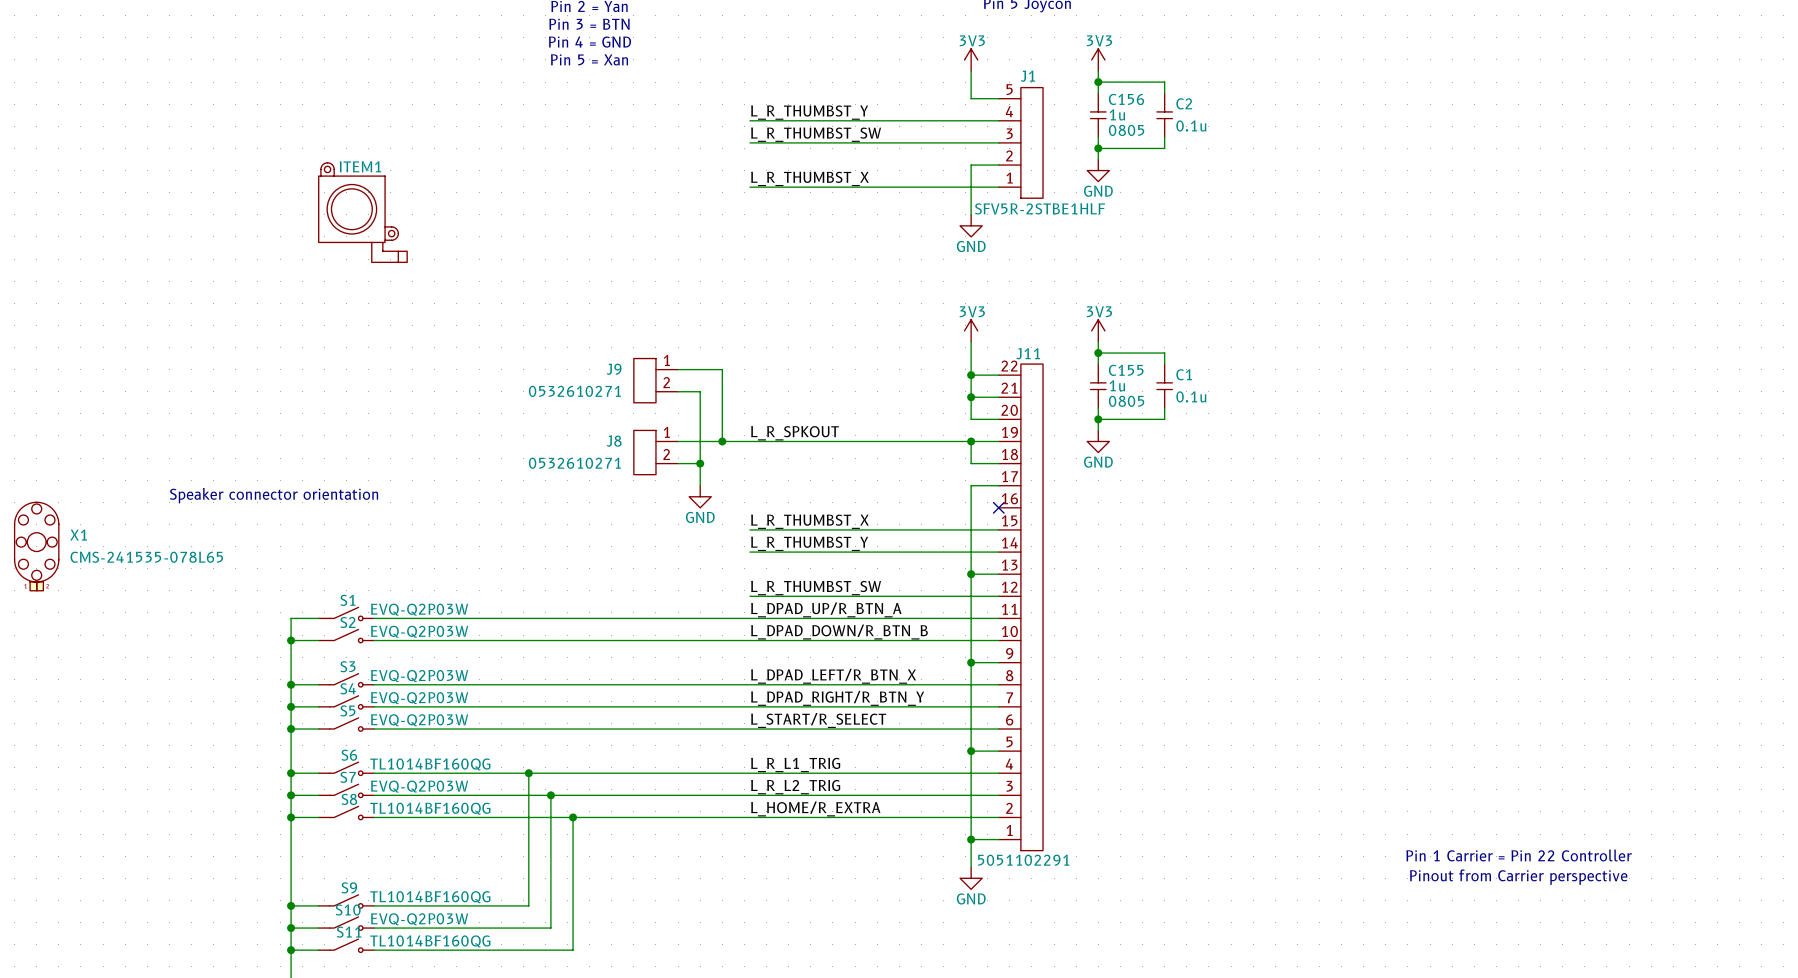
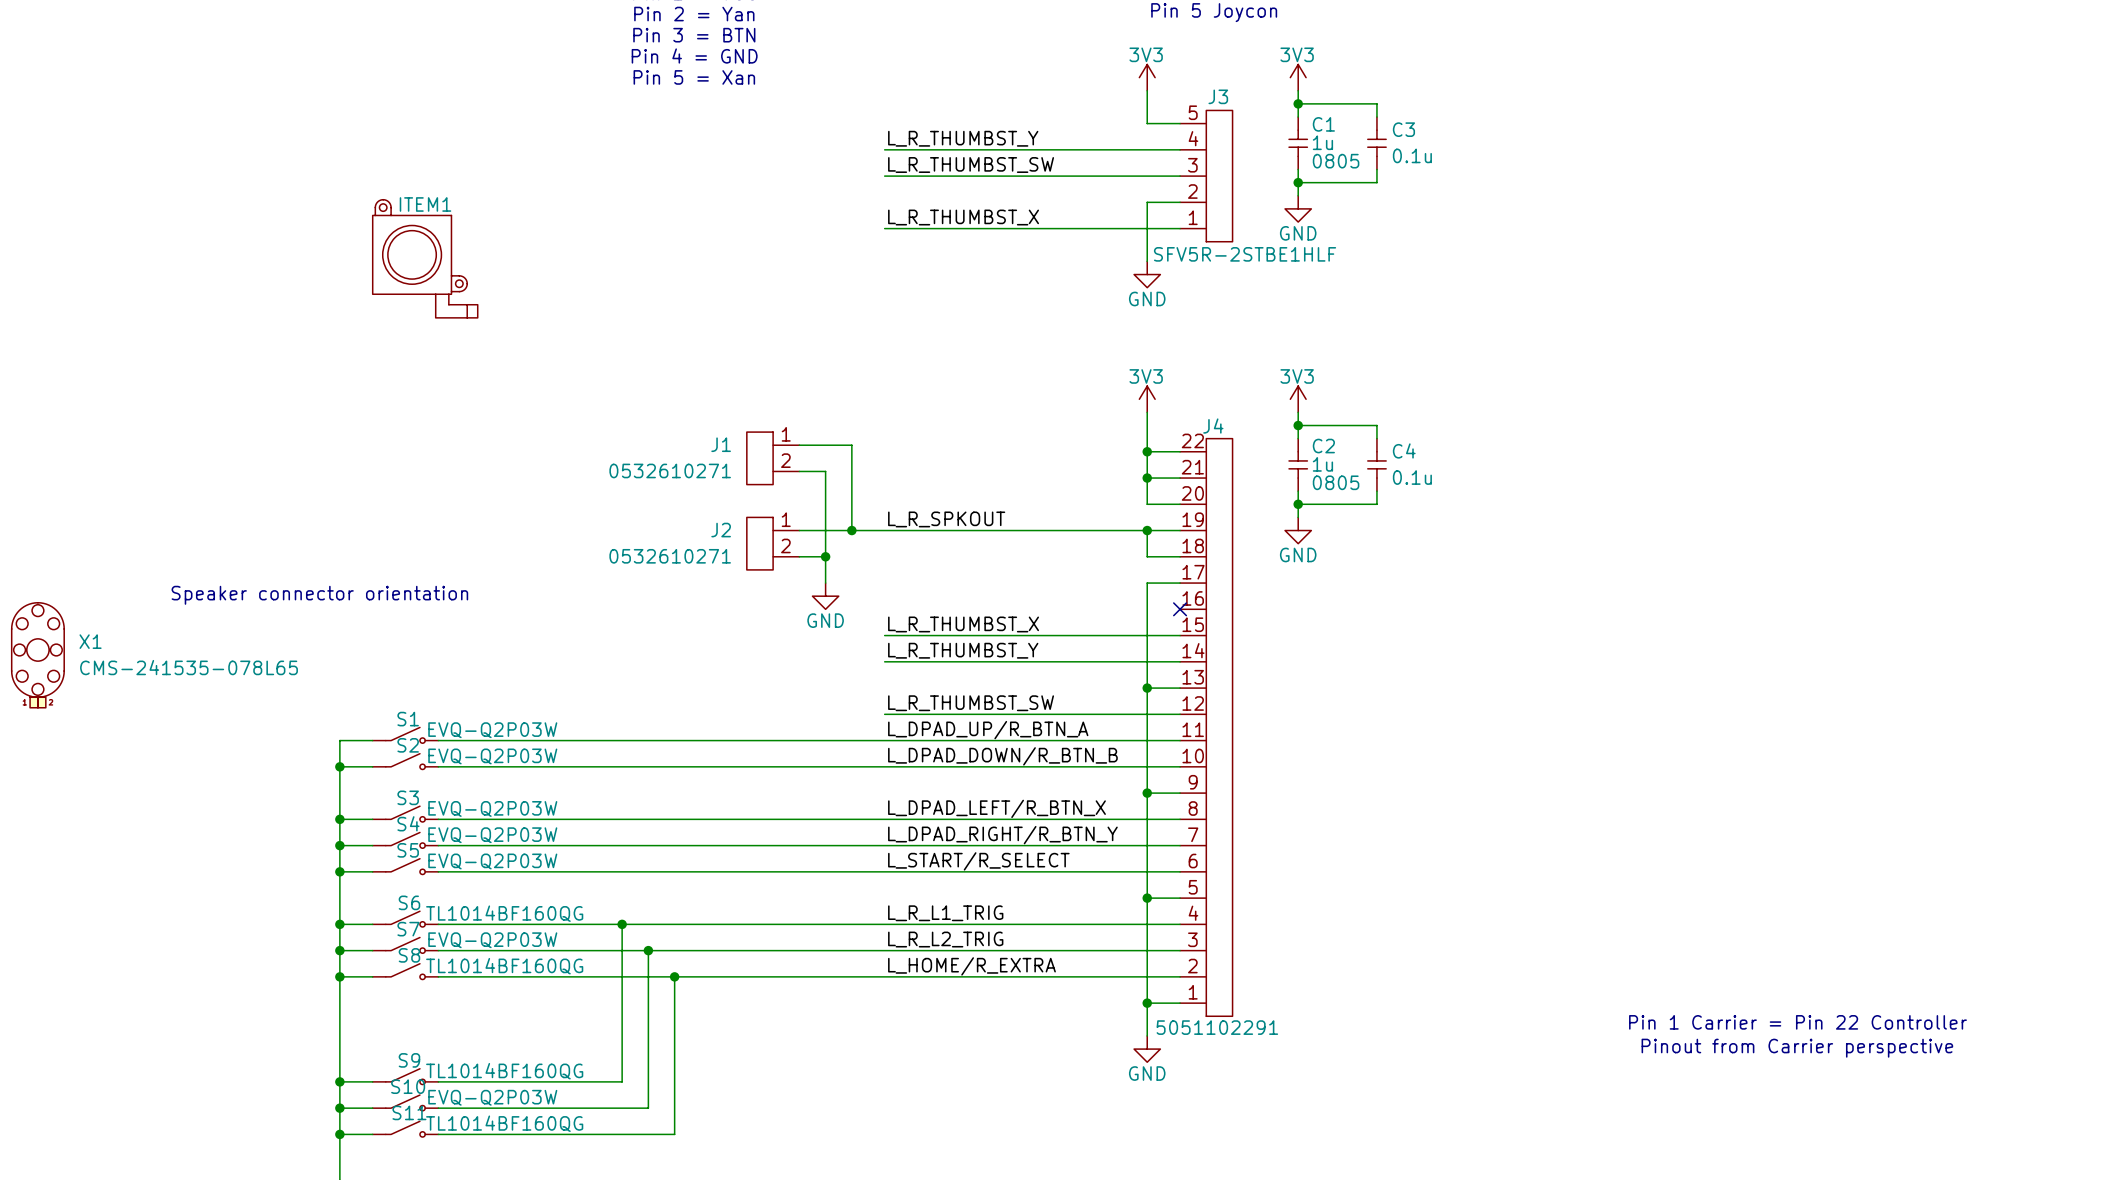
J1 name: J1 (1027, 76) -> J3 (1218, 96)
C156 name: C156 (1126, 99) -> C1 (1323, 124)
C2 name: C2 (1184, 103) -> C3 (1403, 129)
J11 name: J11 (1028, 353) -> J4 (1213, 426)
J9 name: J9 (614, 369) -> J1 (721, 444)
C155 name: C155 (1126, 370) -> C2 (1323, 446)
C1 name: C1 (1184, 374) -> C4 (1404, 450)
J8 name: J8 (614, 441) -> J2 (721, 530)

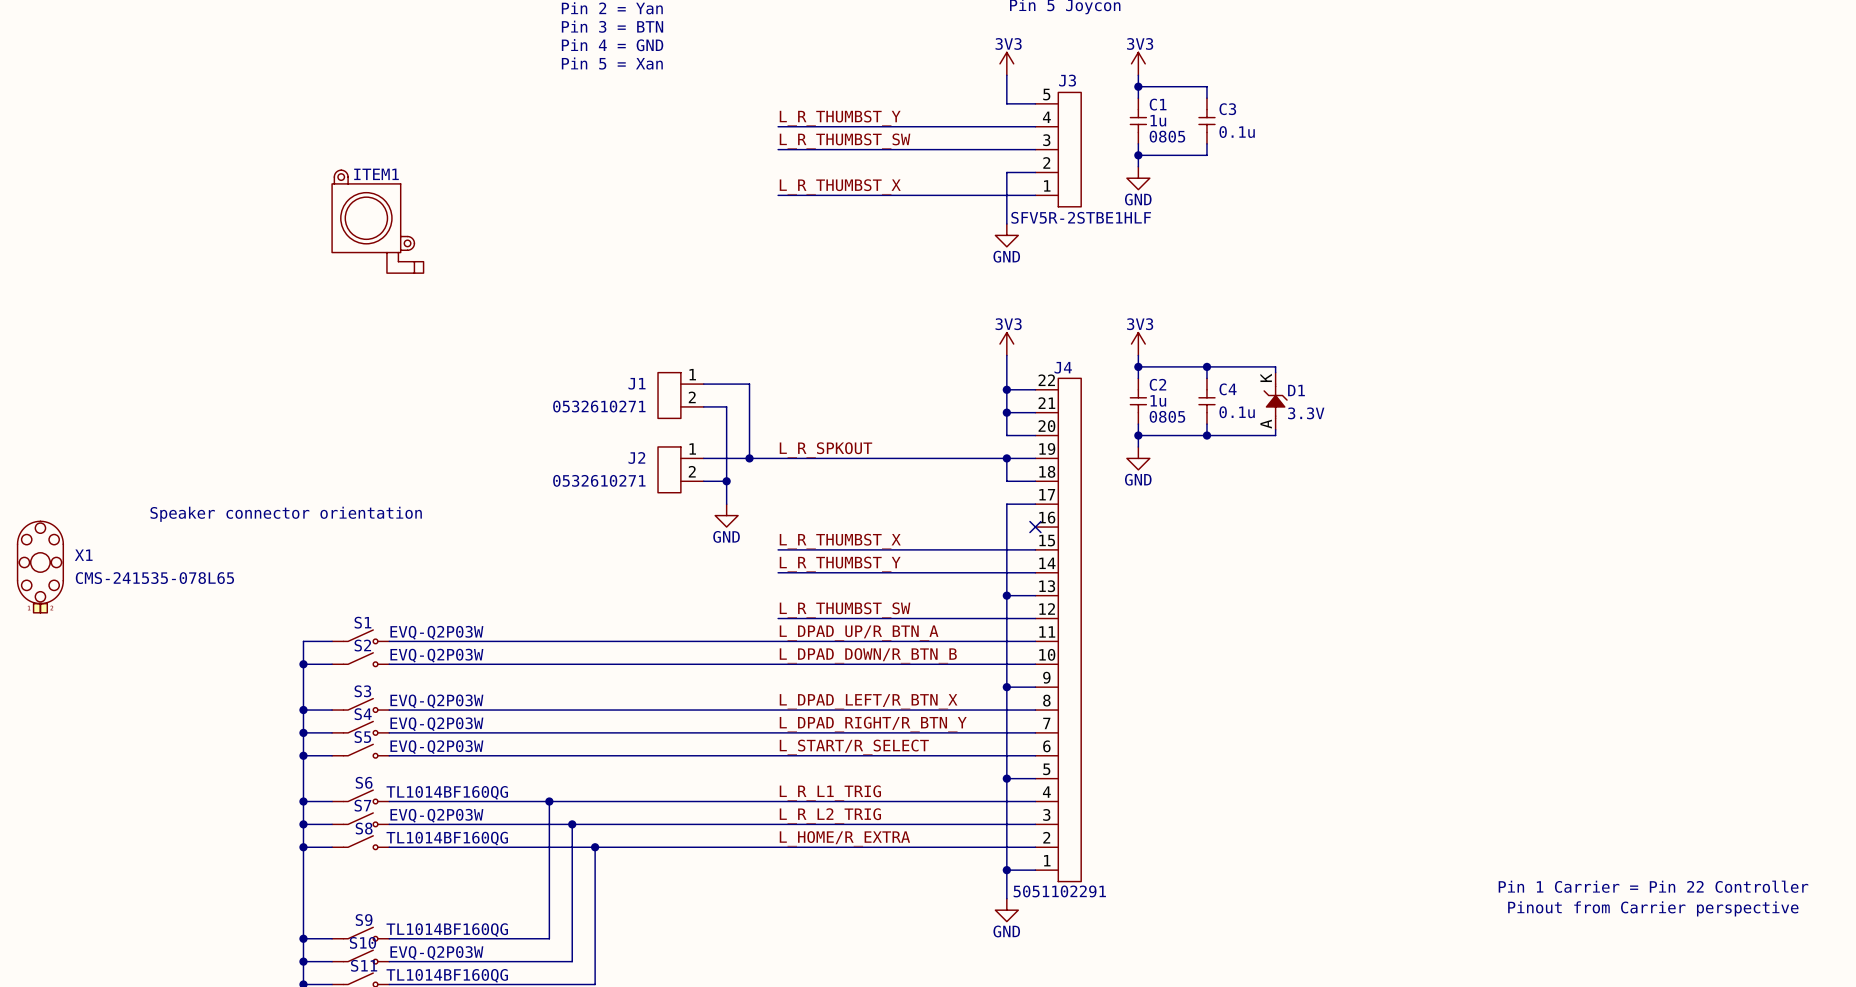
wire: none -> (1206, 366) (1275, 366) (1275, 372)
junction: none -> (1206, 366)
D1: none -> (1275, 401)
wire: none -> (1275, 429) (1275, 435) (1206, 435)
junction: none -> (1206, 435)
text position: Pin 1 Carrier = Pin 22 Controller (1797, 1022) -> Pin 1 Carrier = Pin 22 Controller (1653, 886)
text position: Pinout from Carrier perspective (1797, 1048) -> Pinout from Carrier perspective (1653, 908)

